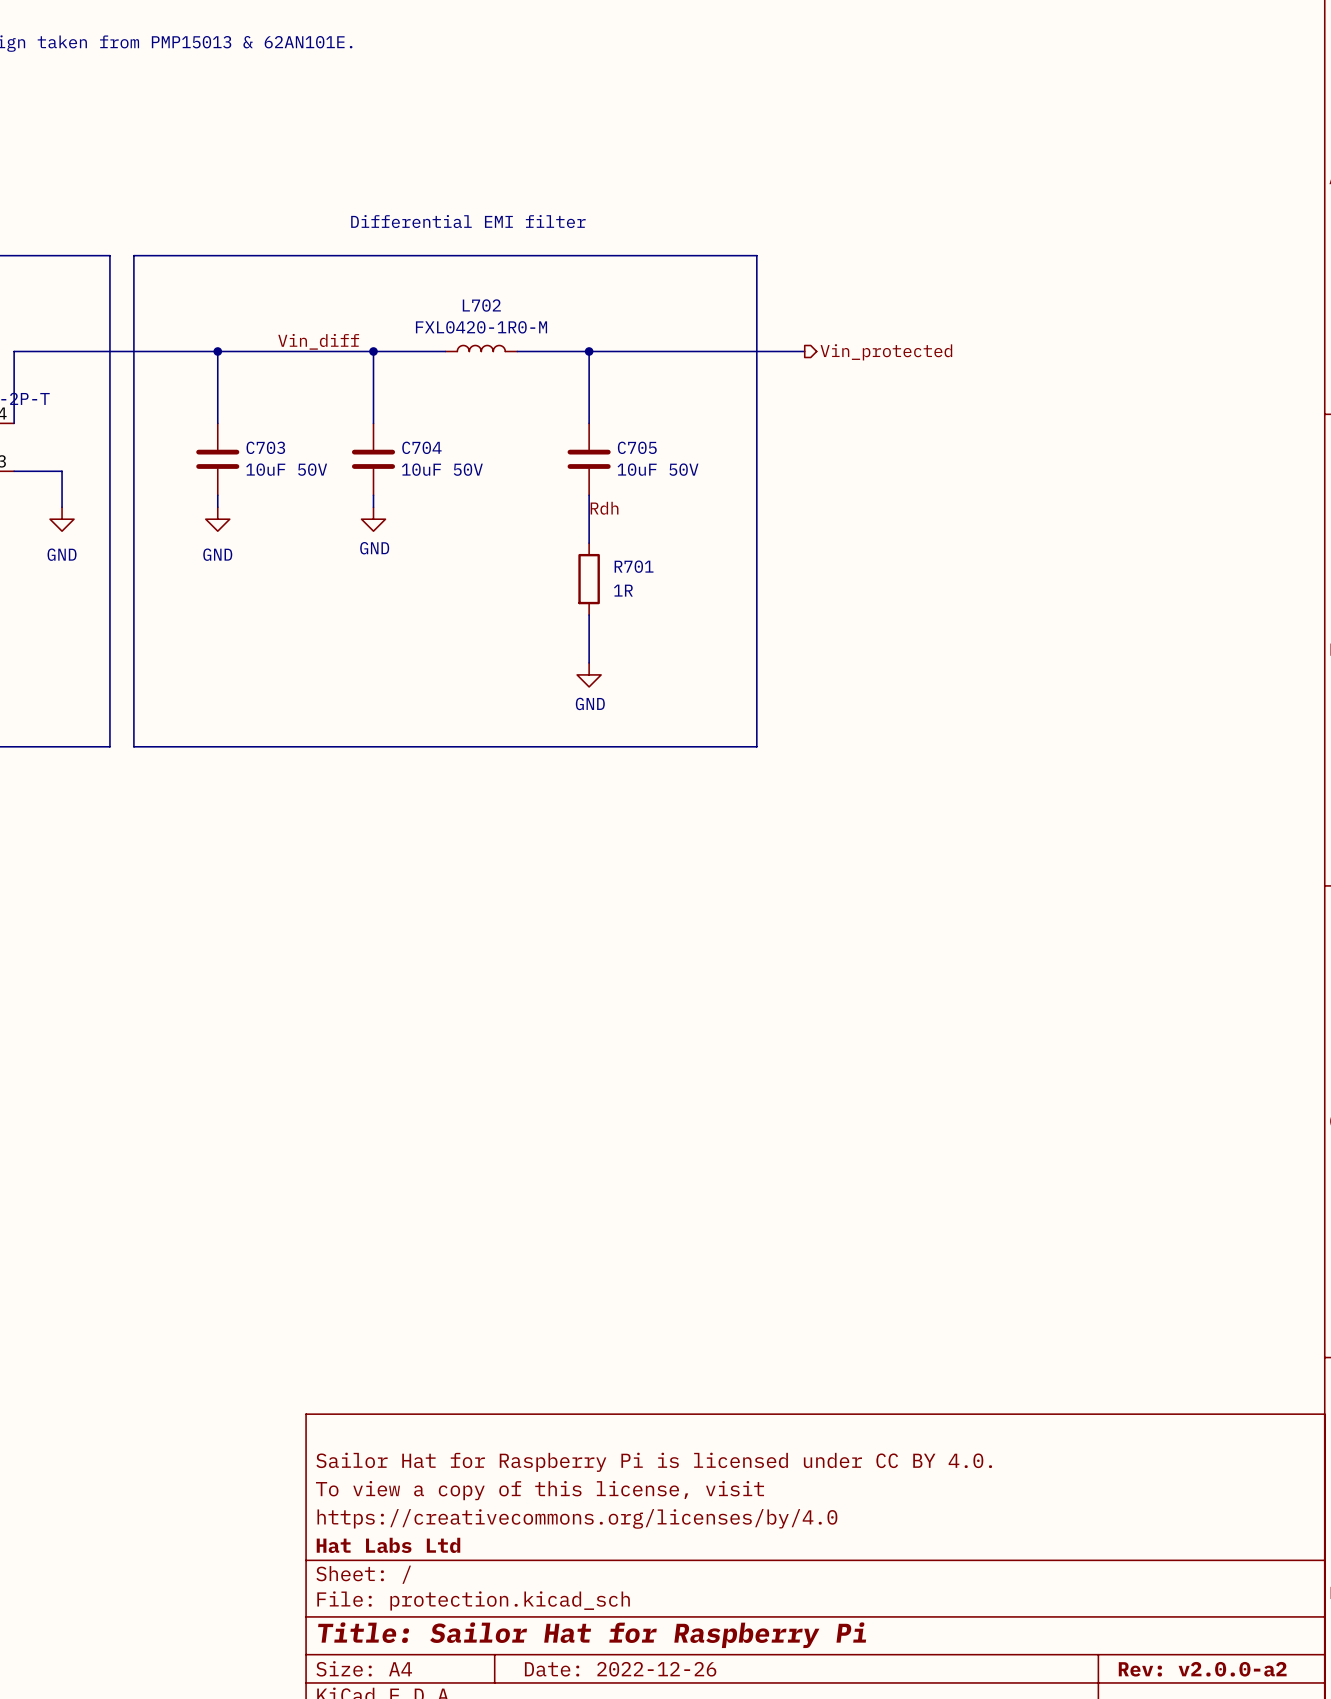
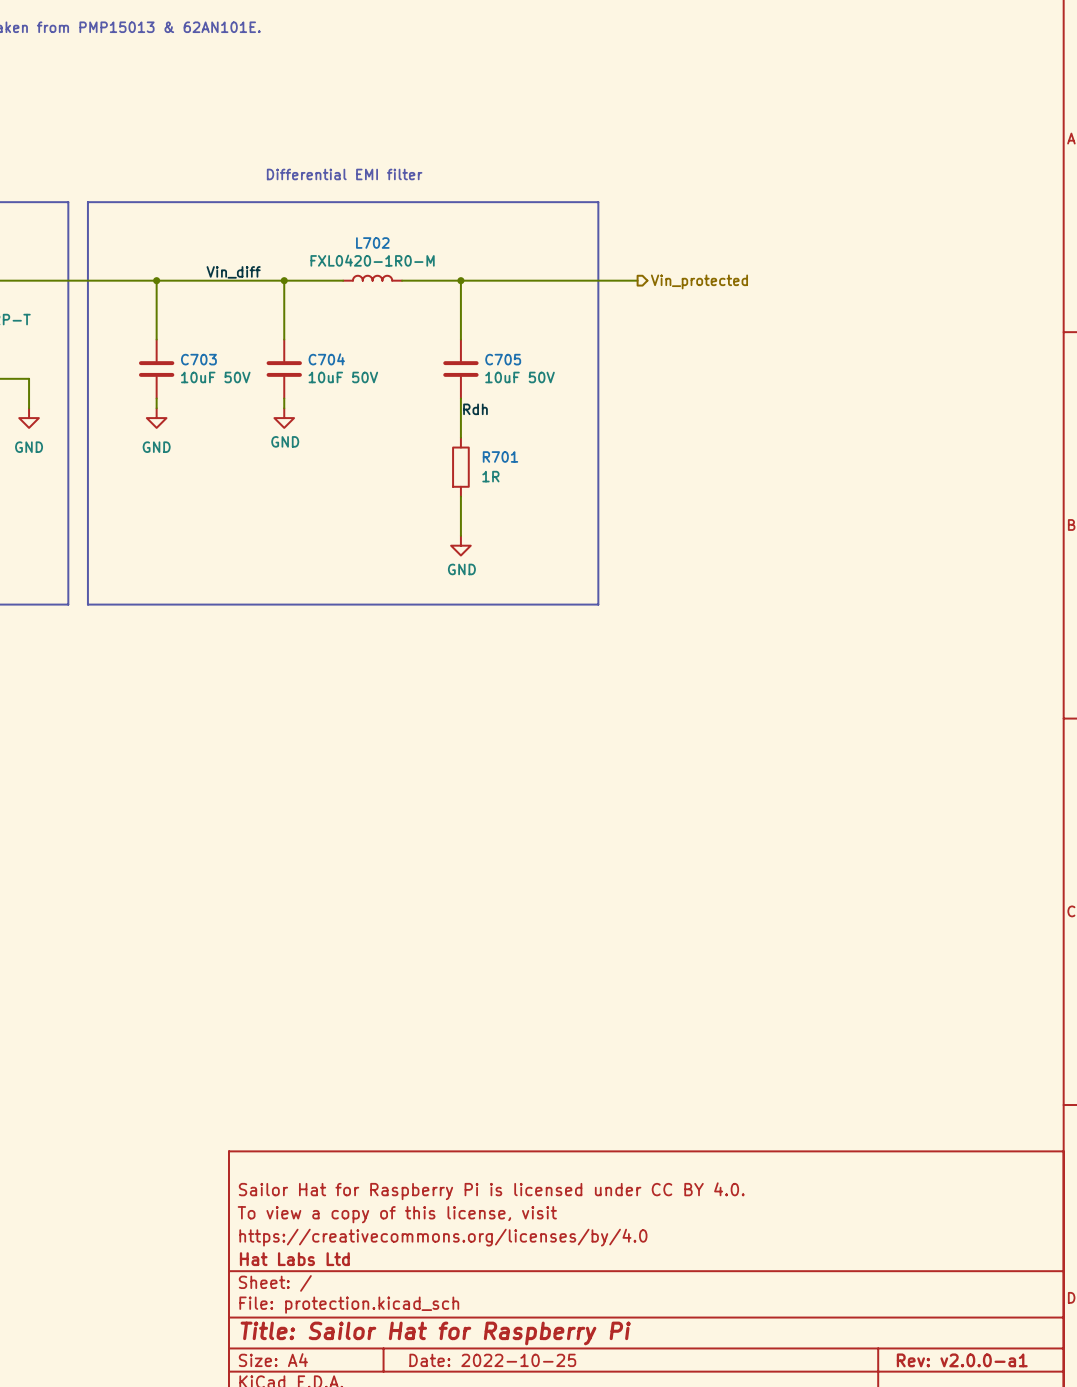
title block: Date: 2022-12-26 (620, 1669) -> Date: 2022-10-25 (492, 1360)
title block: Rev: v2.0.0-a2 (1202, 1669) -> Rev: v2.0.0-a1 (962, 1360)

